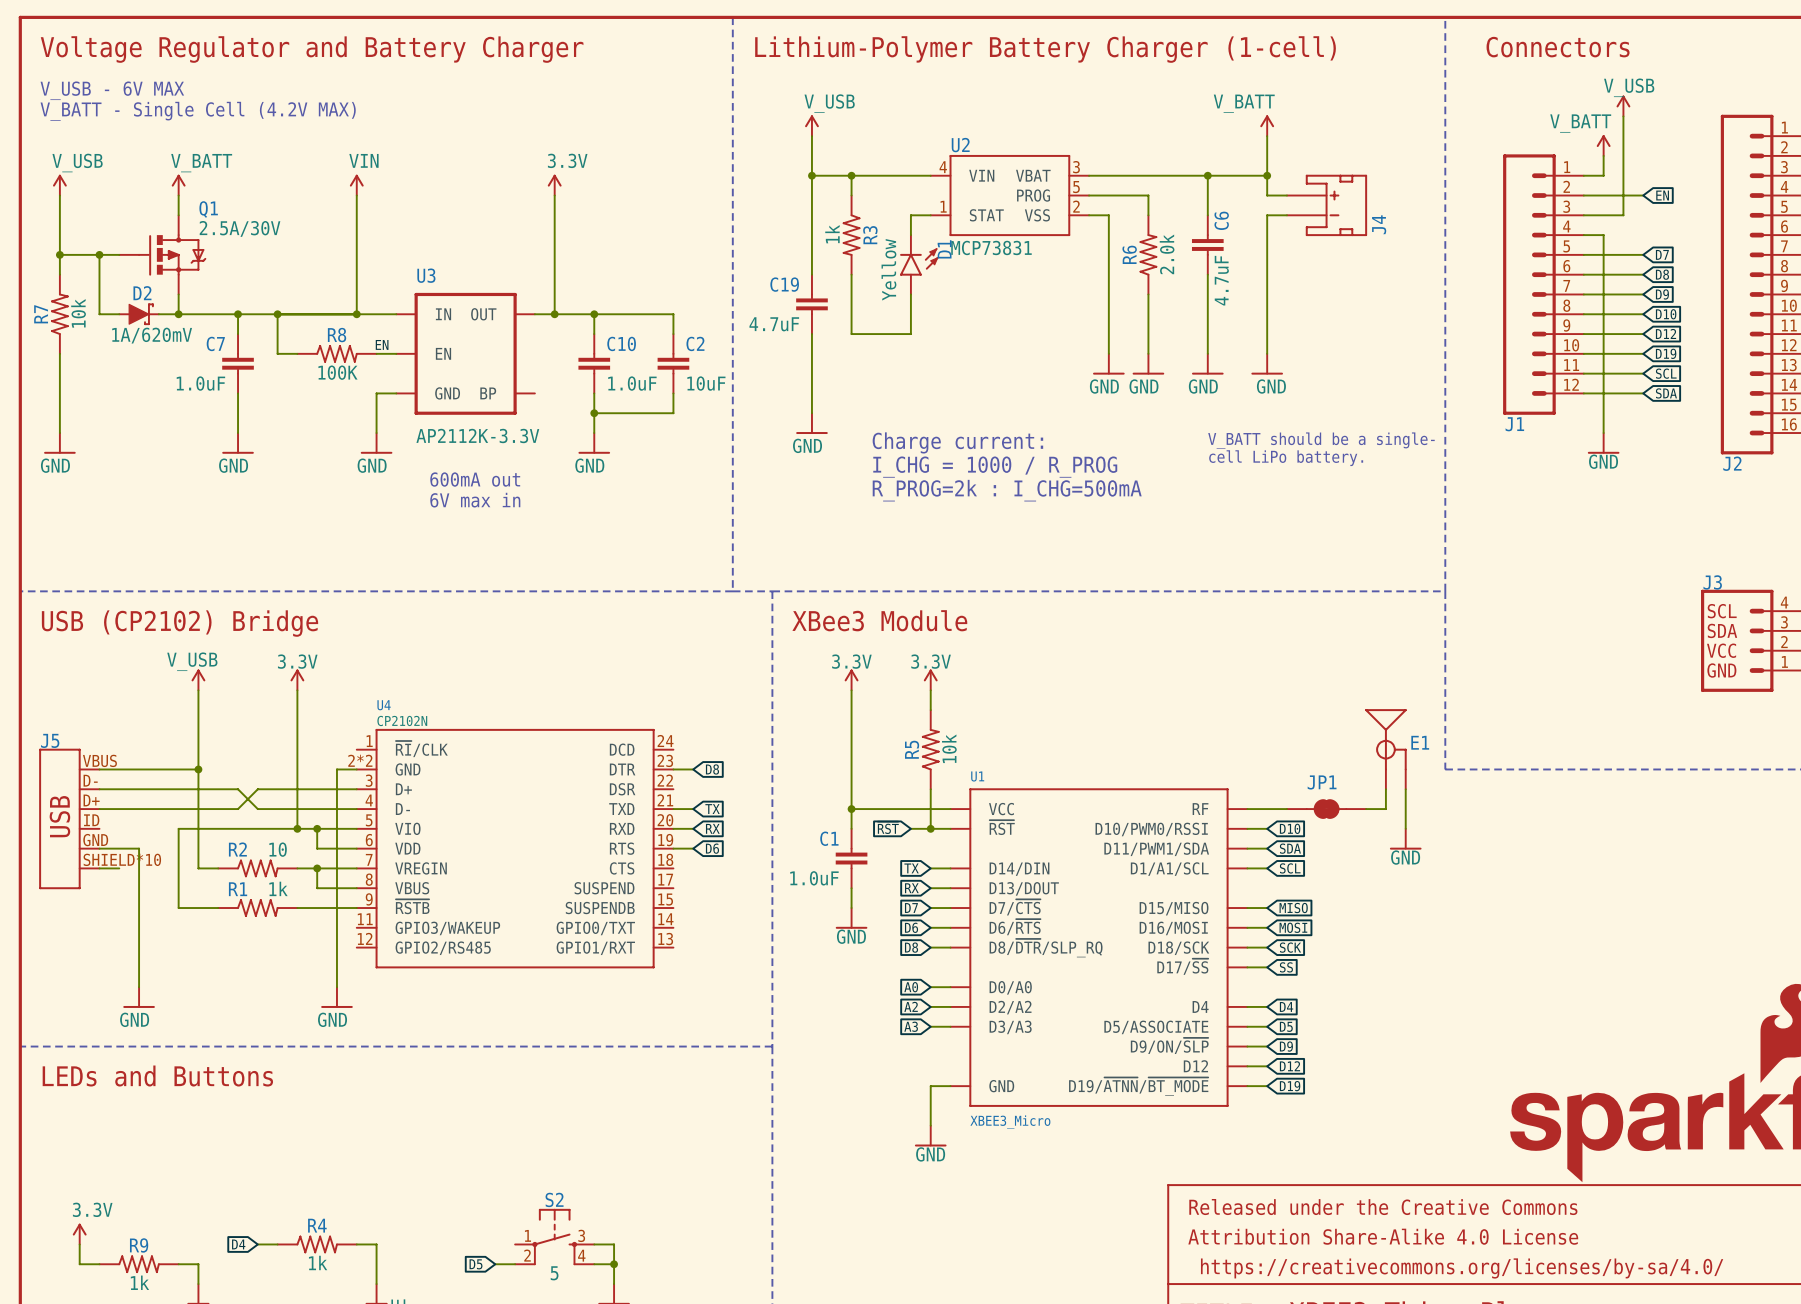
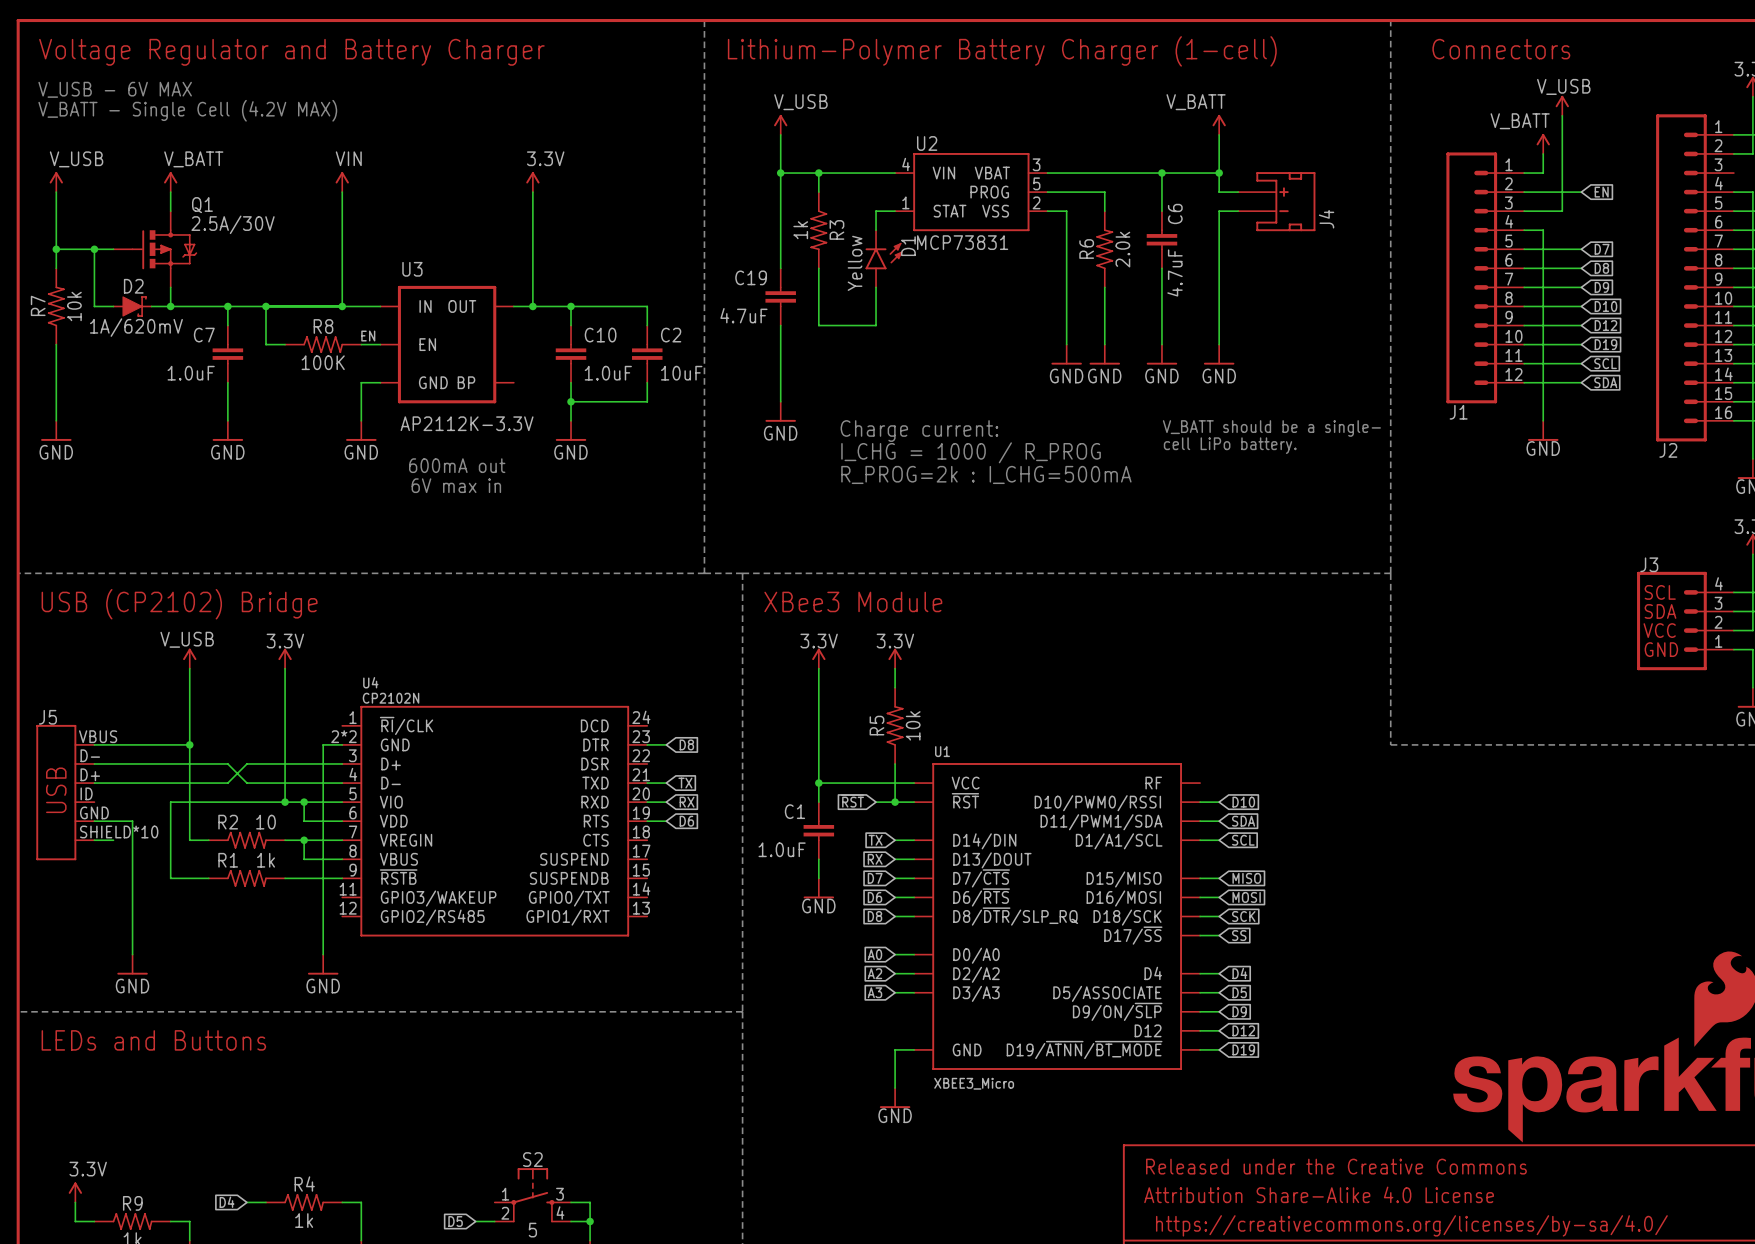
E1: (1385, 749) -> none
wire: (1385, 789) (1385, 809) (1366, 809) -> none
wire: (1405, 789) (1405, 828) -> none
wire: (1247, 809) (1286, 809) -> none
JP1: (1326, 809) -> none
power symbol: GND (1405, 839) -> none

